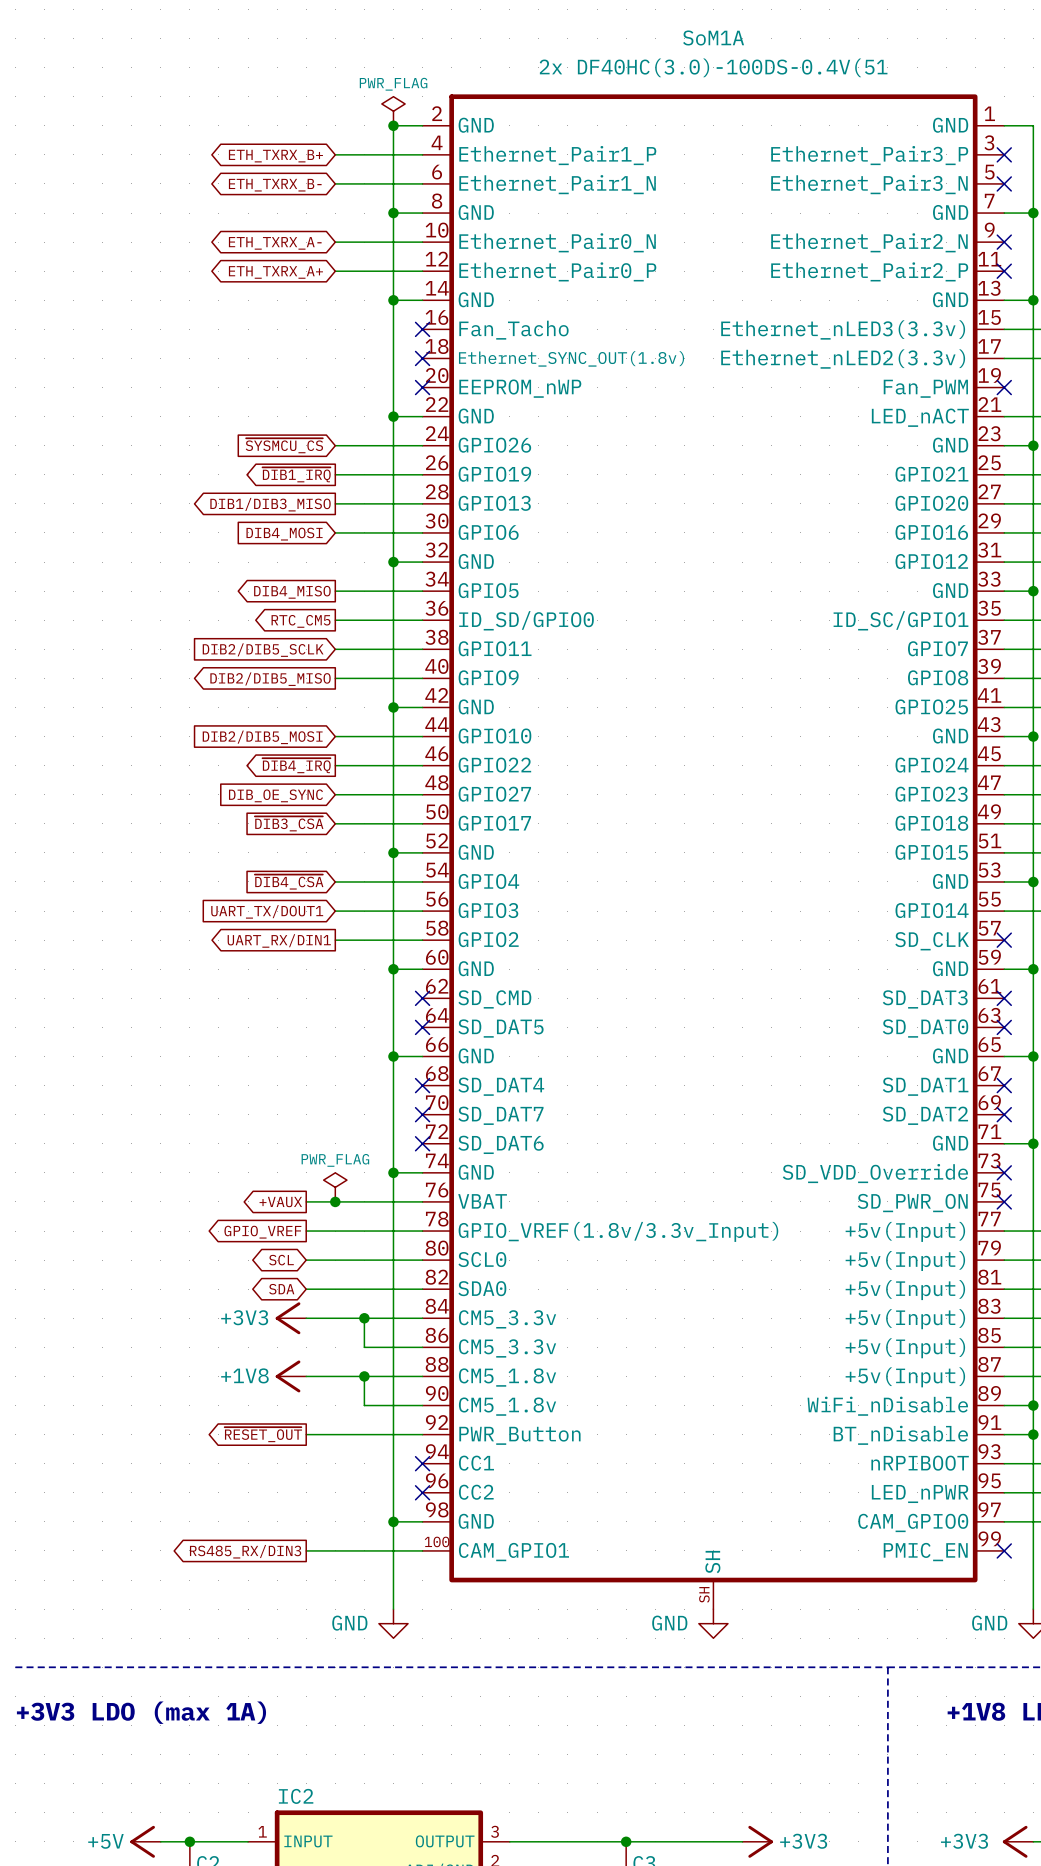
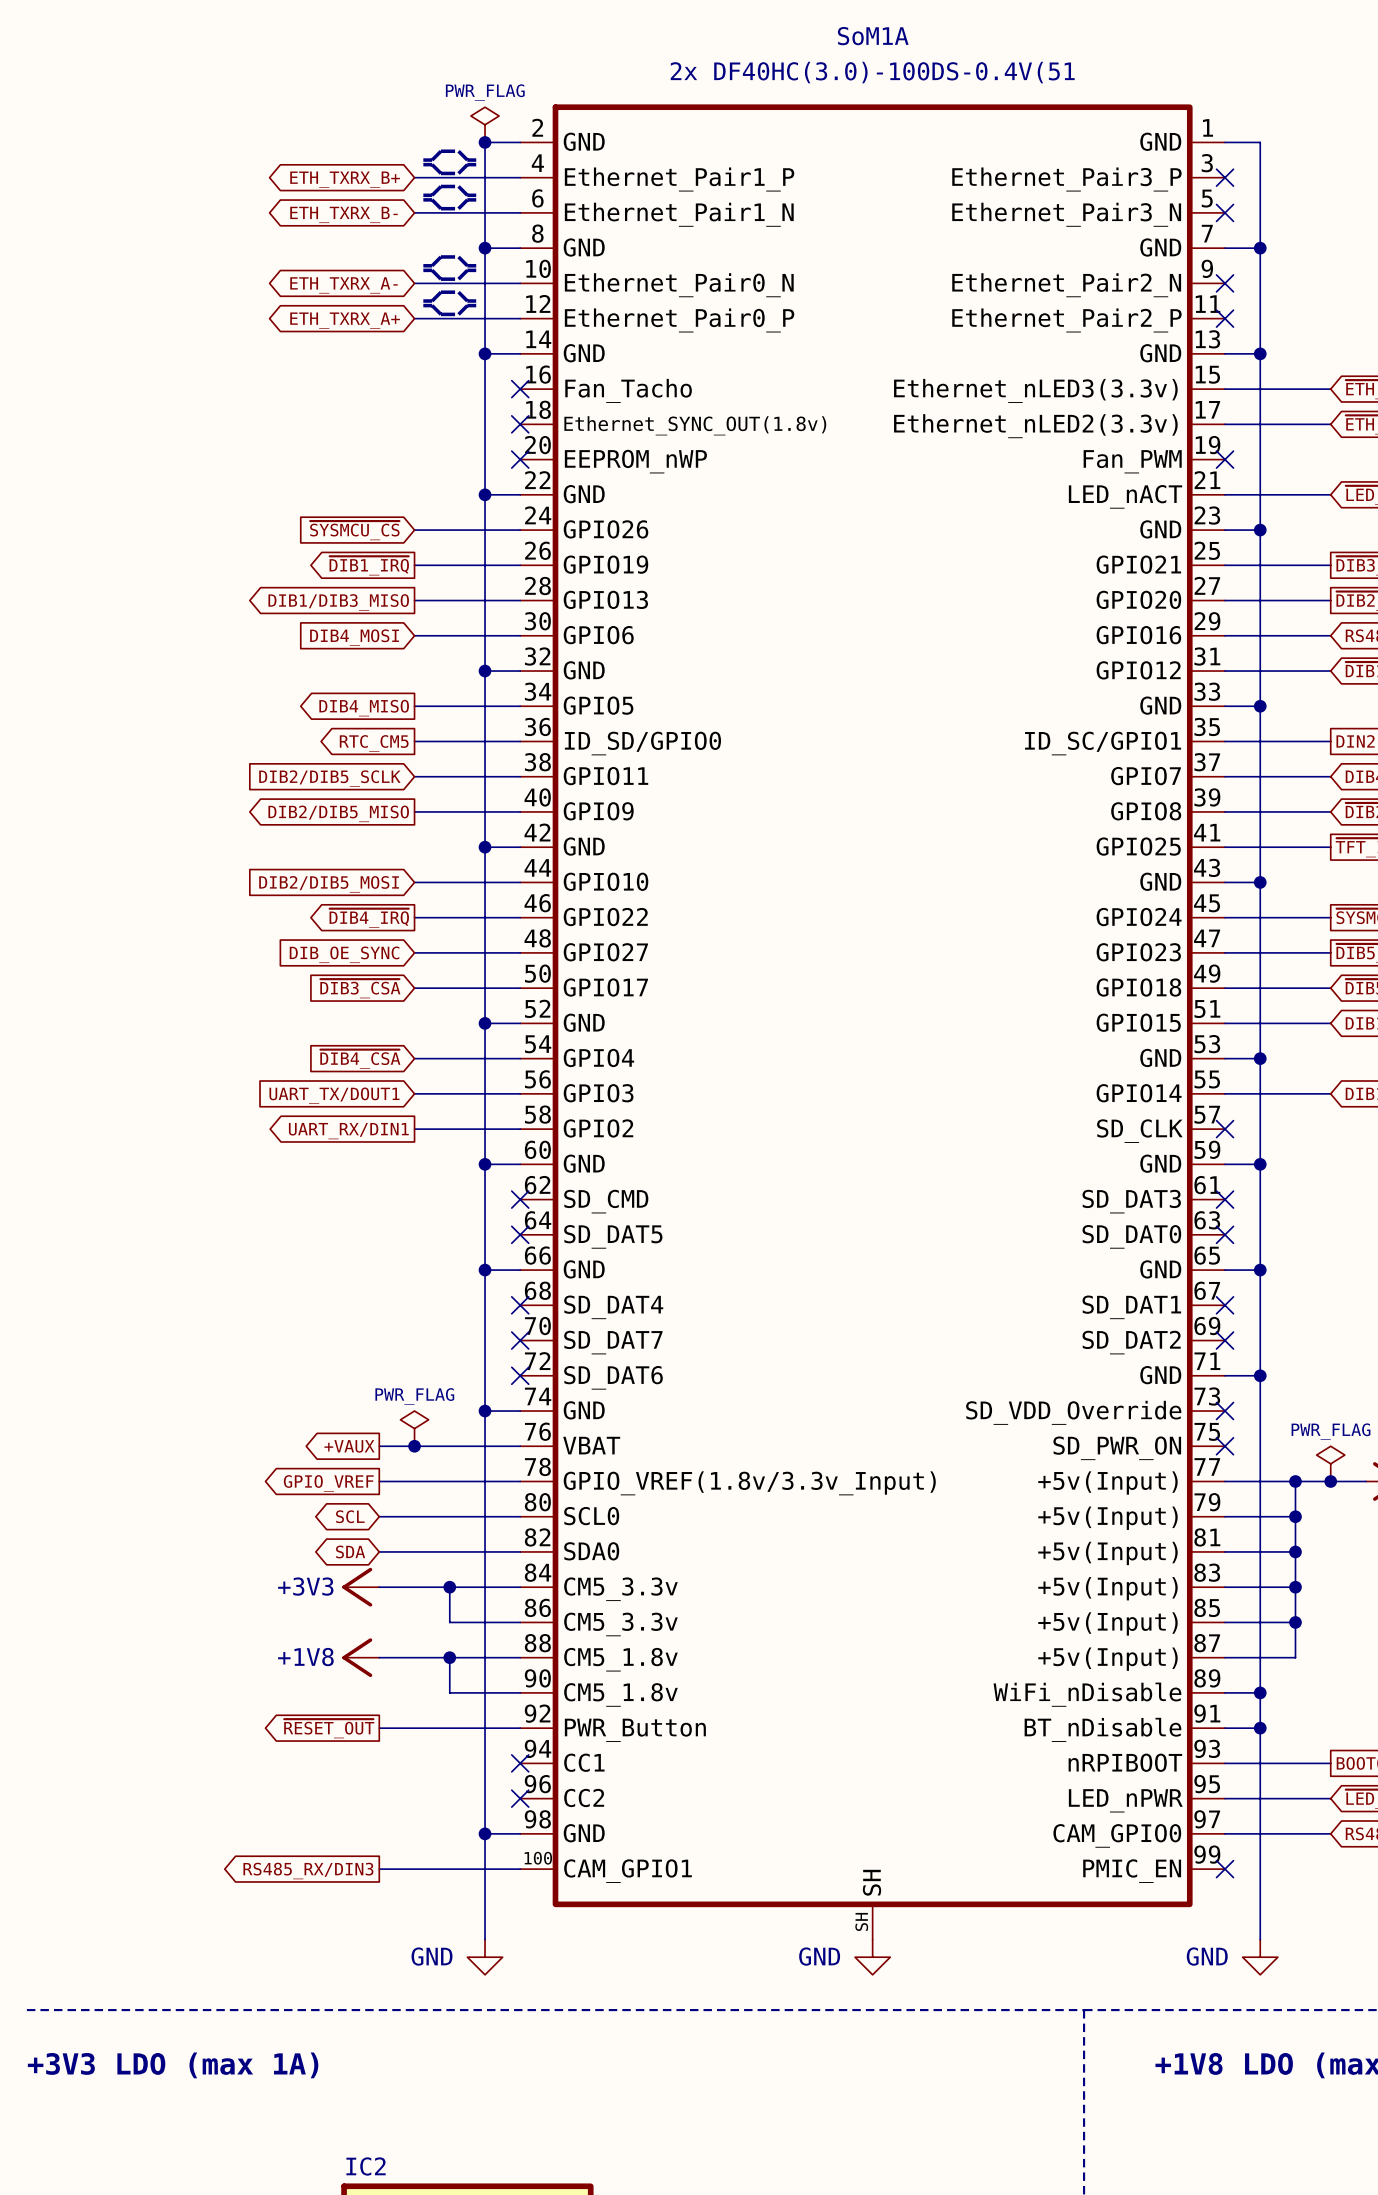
line: none -> (423, 160) (432, 160) (440, 151) (458, 151) (467, 160) (476, 160)
line: none -> (423, 164) (432, 164) (440, 173) (458, 173) (467, 164) (476, 164)
line: none -> (423, 195) (432, 195) (440, 186) (458, 186) (467, 195) (476, 195)
line: none -> (423, 199) (432, 199) (440, 208) (458, 208) (467, 199) (476, 199)
line: none -> (423, 265) (432, 265) (440, 256) (458, 256) (467, 265) (476, 265)
line: none -> (423, 270) (432, 270) (440, 279) (458, 279) (467, 270) (476, 270)
line: none -> (423, 301) (432, 301) (440, 292) (458, 292) (467, 301) (476, 301)
line: none -> (423, 305) (432, 305) (440, 314) (458, 314) (467, 305) (476, 305)

